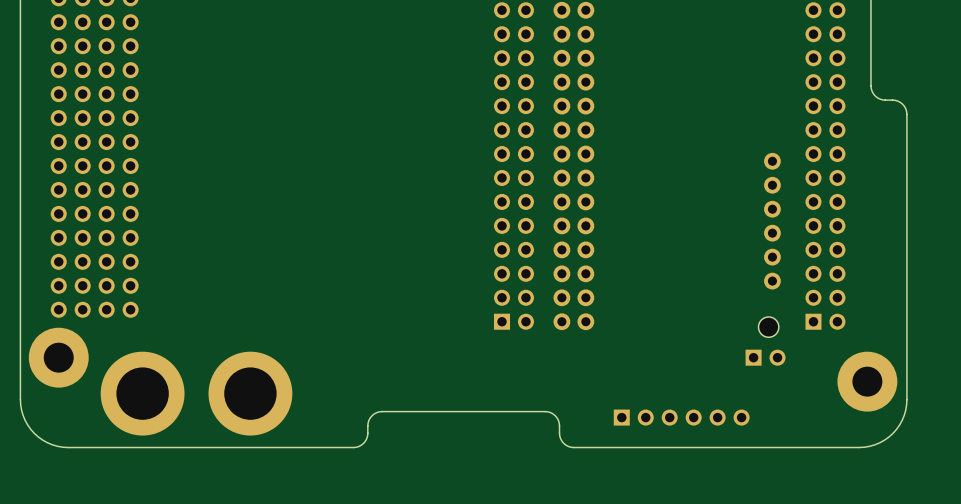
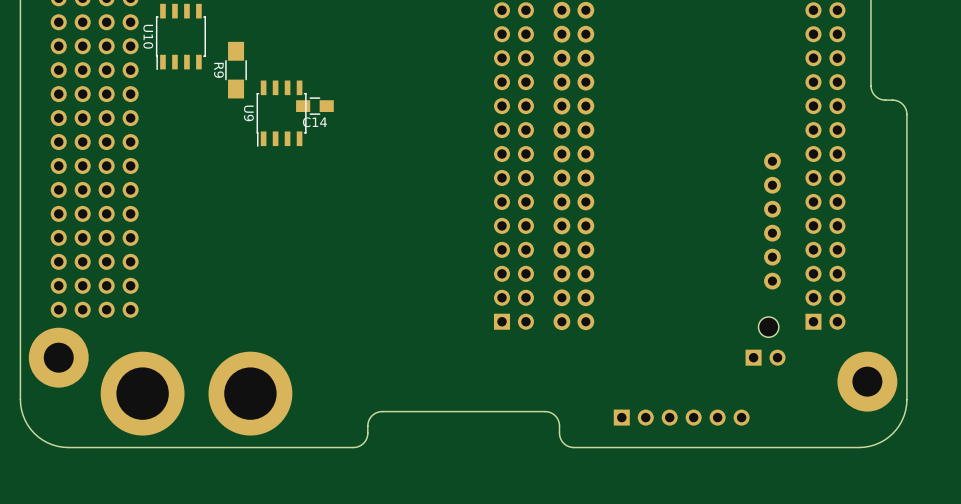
U10: none -> (180, 36)
R9: none -> (236, 70)
C14: none -> (314, 106)
U9: none -> (281, 113)

